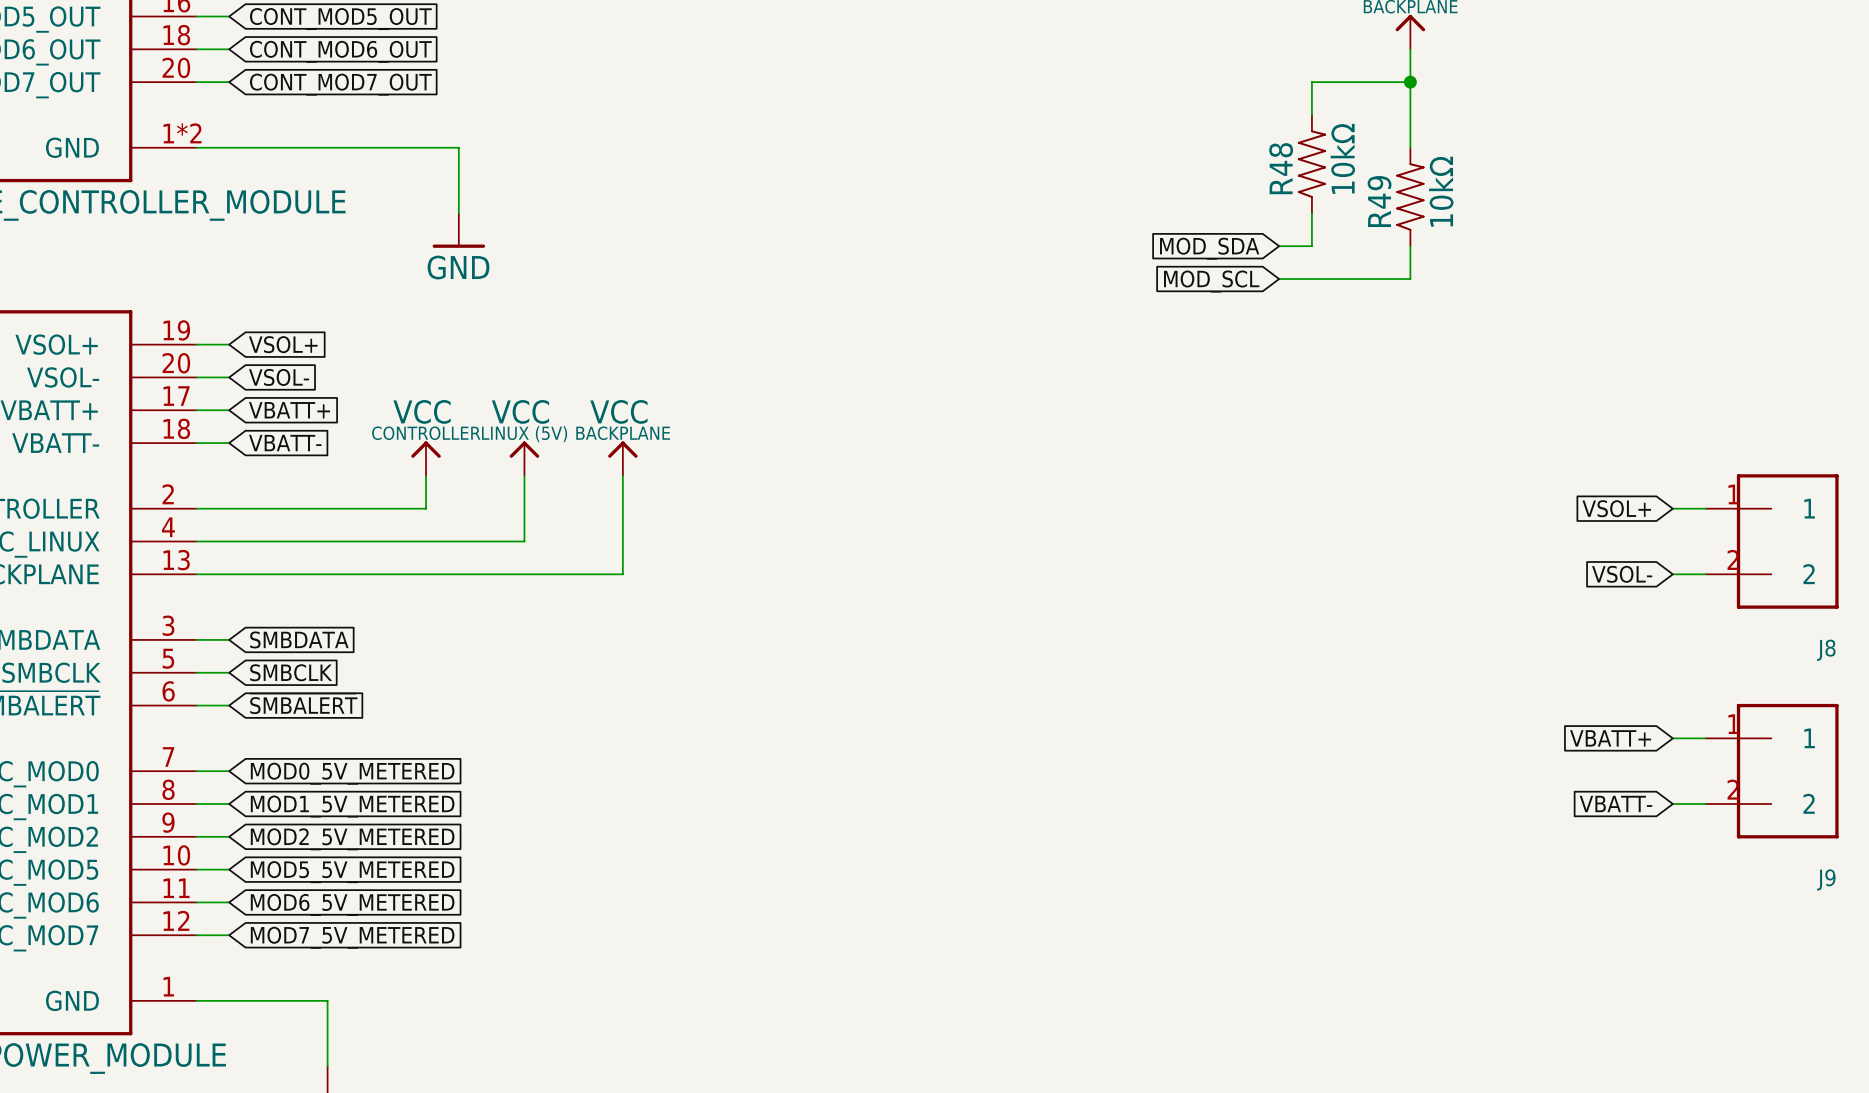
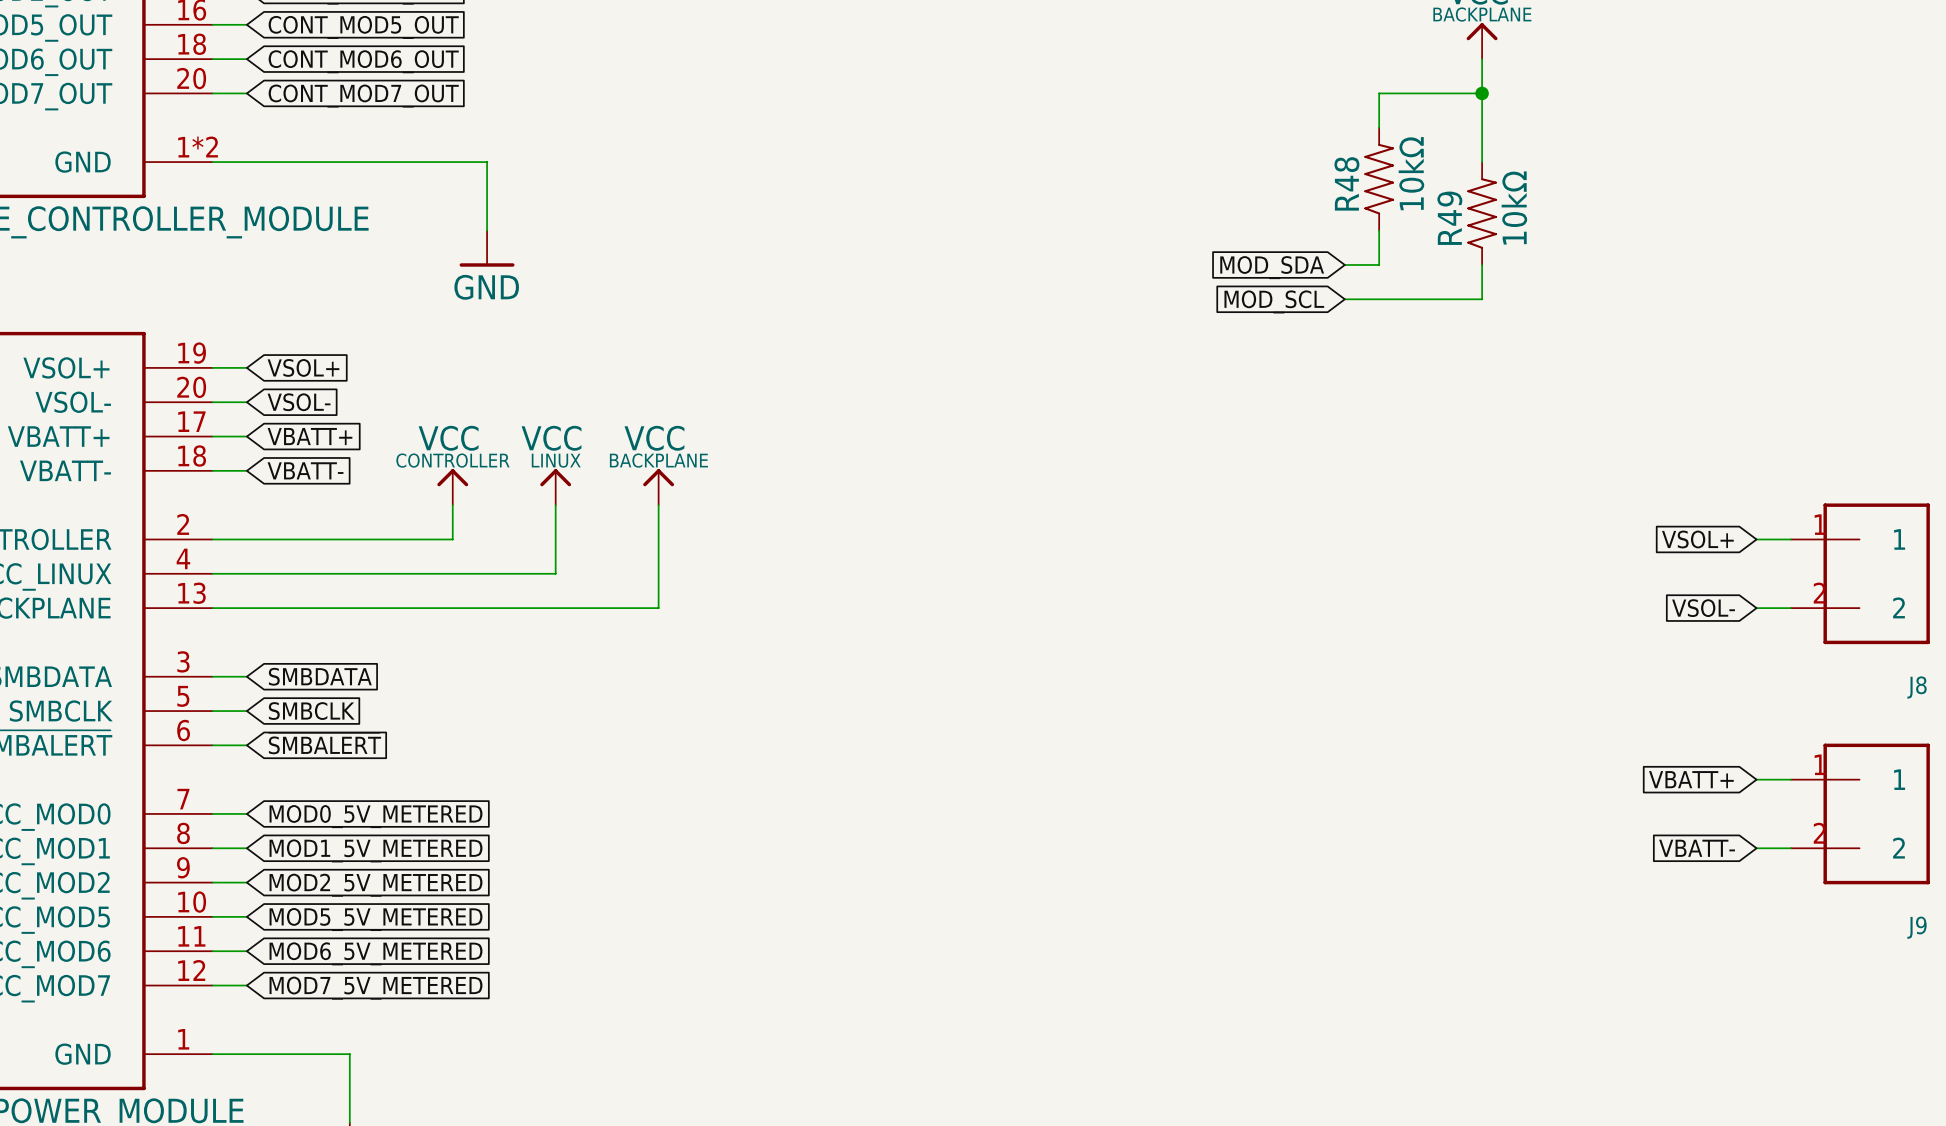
power symbol text: LINUX (5V) (524, 434) -> LINUX (556, 460)

